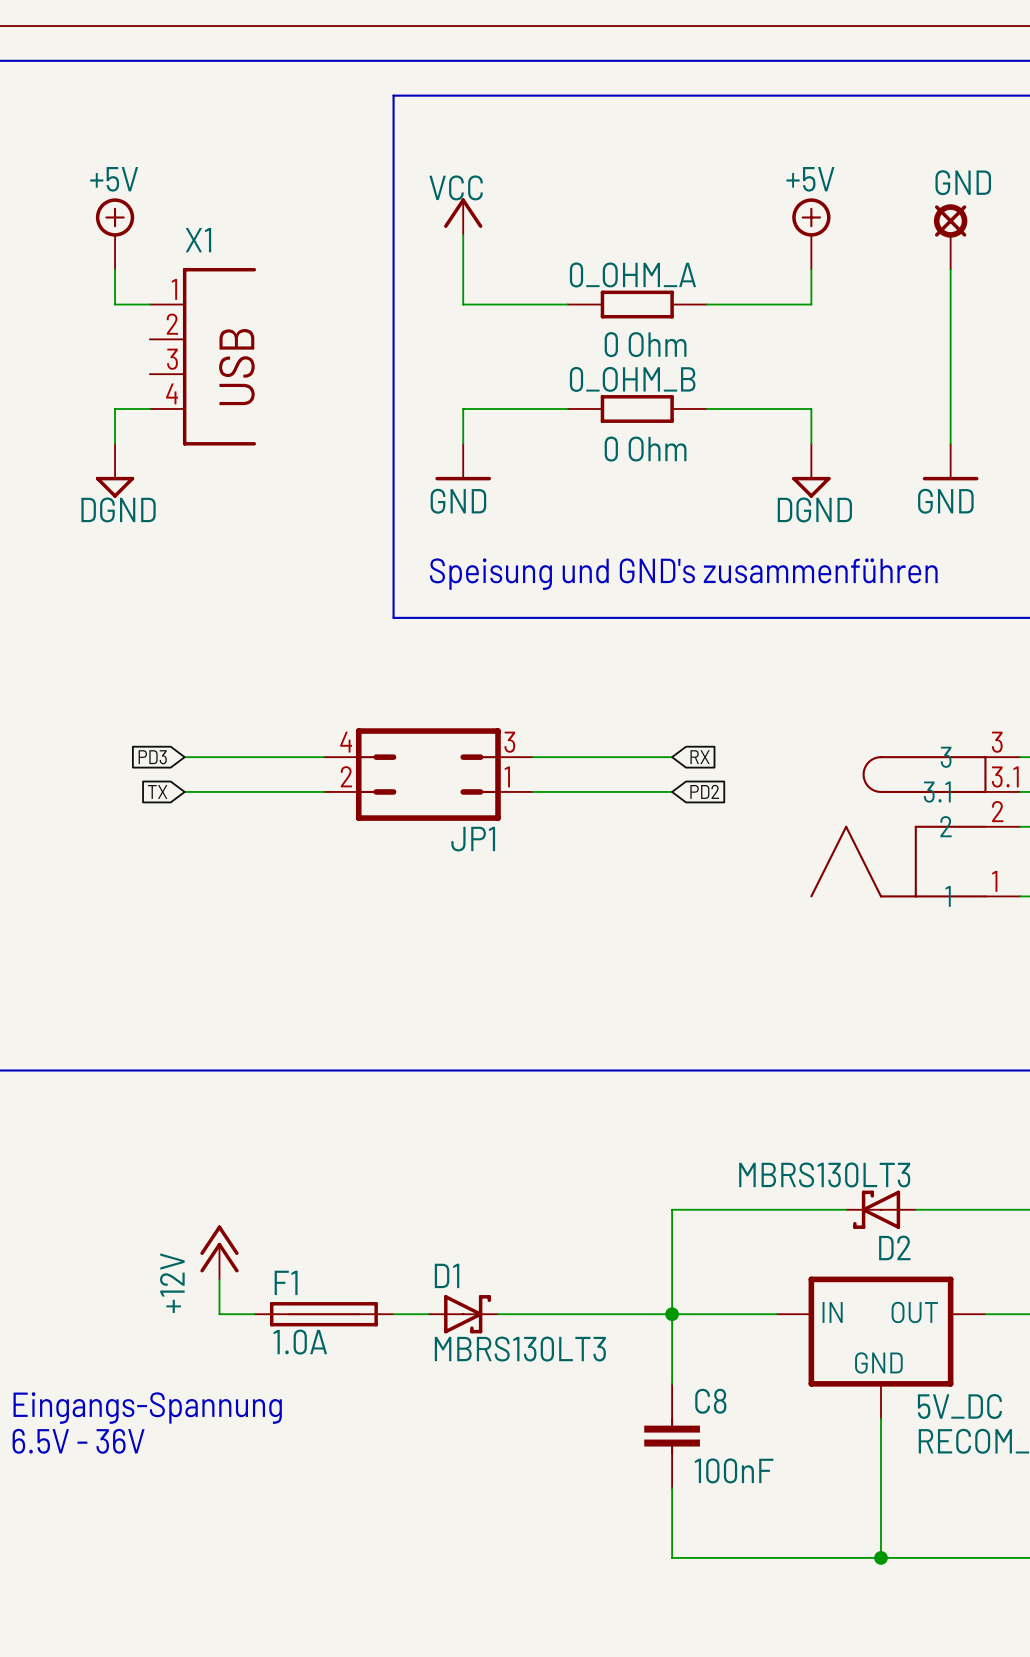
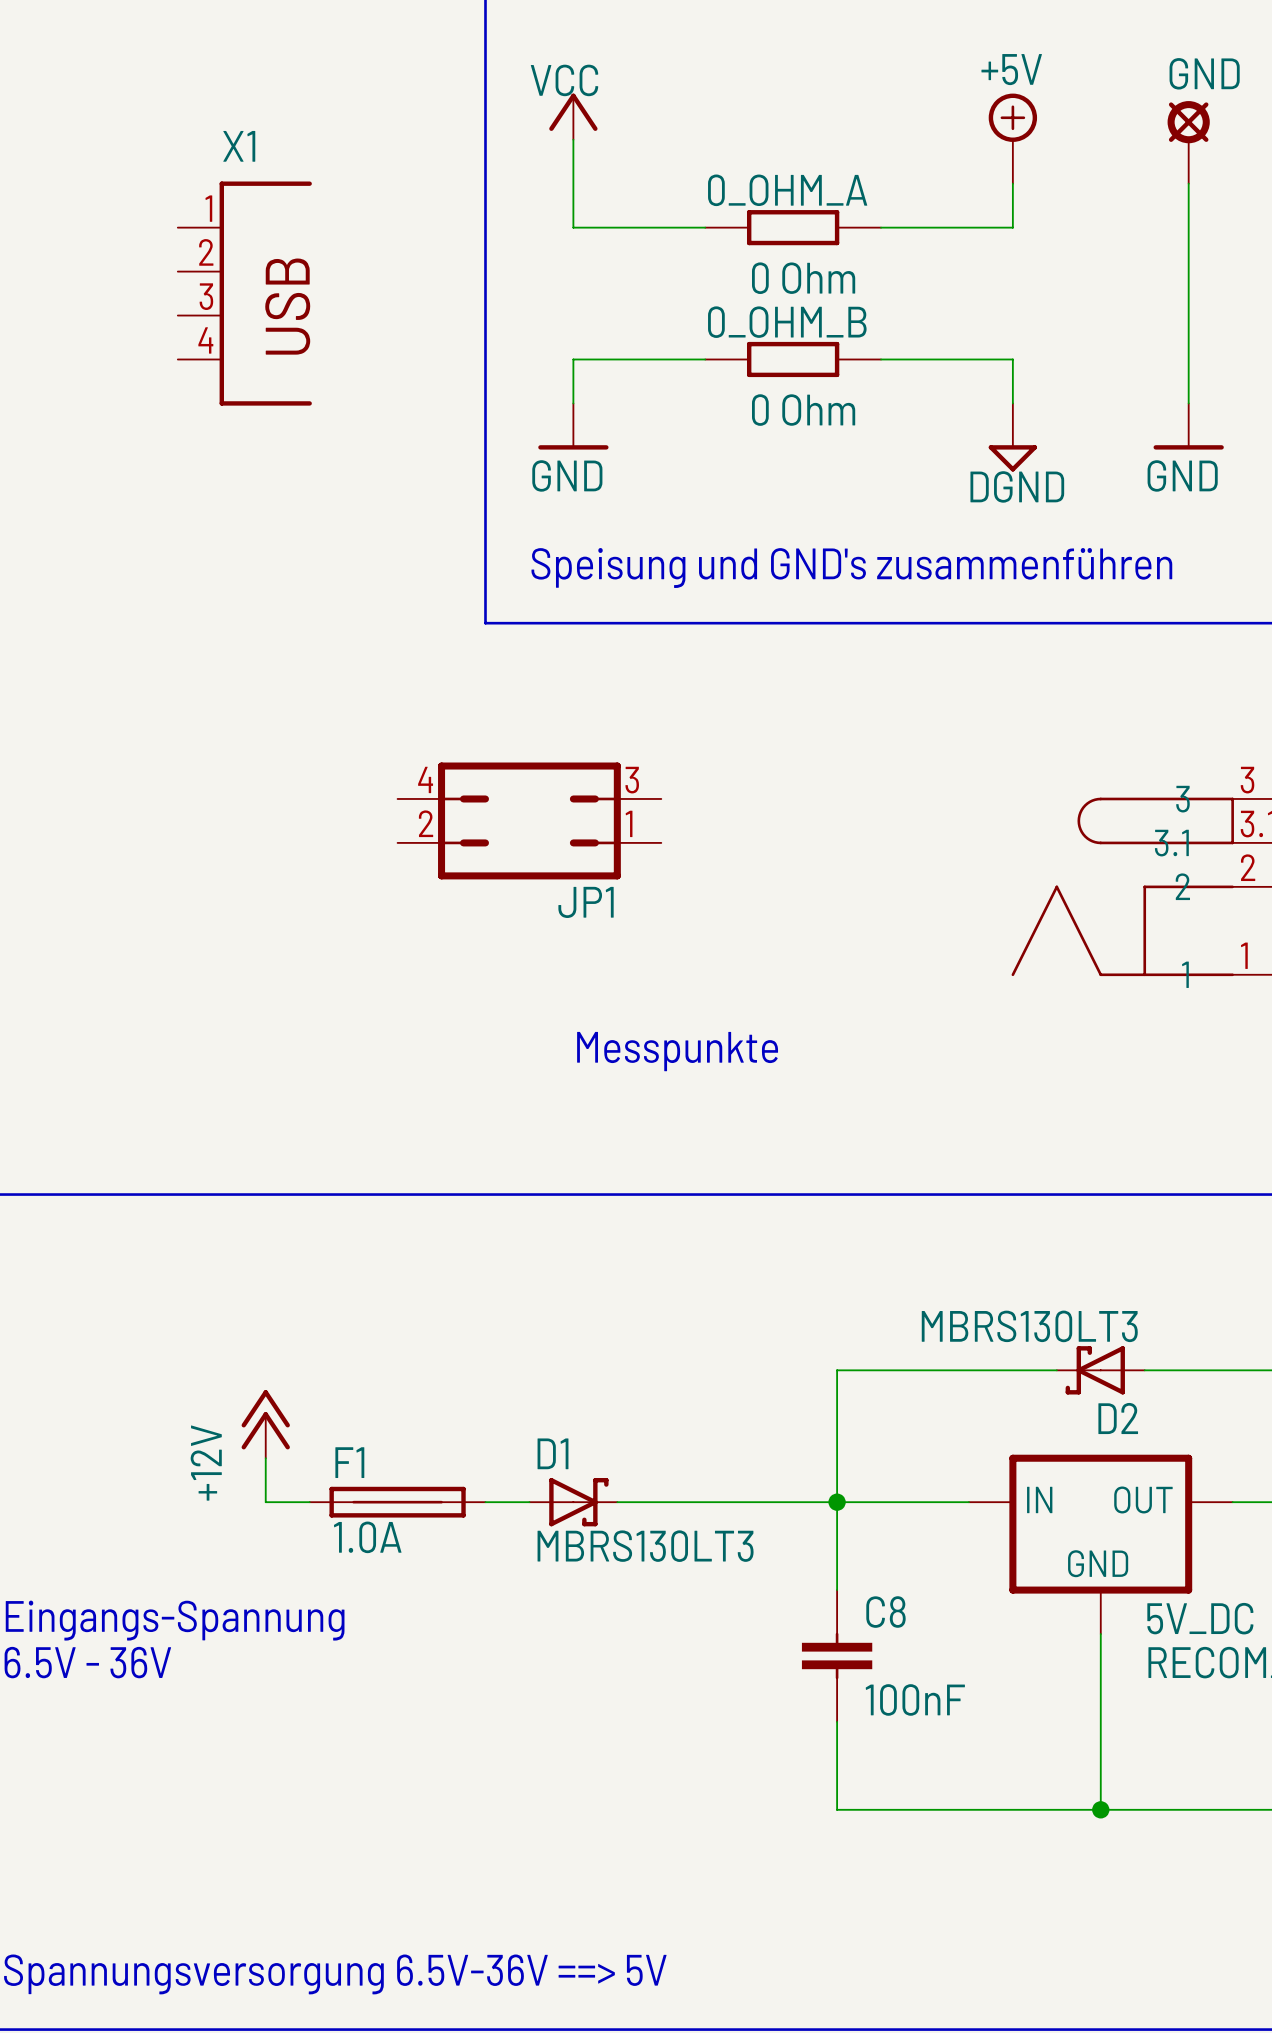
power symbol: +5V (115, 234) -> none
wire: (115, 269) (115, 304) (149, 304) -> none
wire: (149, 408) (115, 408) (115, 443) -> none
power symbol: DGND (115, 470) -> none
global label: PD3 (152, 757) -> none
wire: (184, 757) (323, 757) -> none
wire: (532, 757) (672, 757) -> none
global label: RX (700, 757) -> none
global label: TX (157, 791) -> none
wire: (184, 791) (323, 791) -> none
wire: (532, 791) (672, 791) -> none
global label: PD2 (704, 791) -> none
text: none -> Messpunkte (677, 1051)

